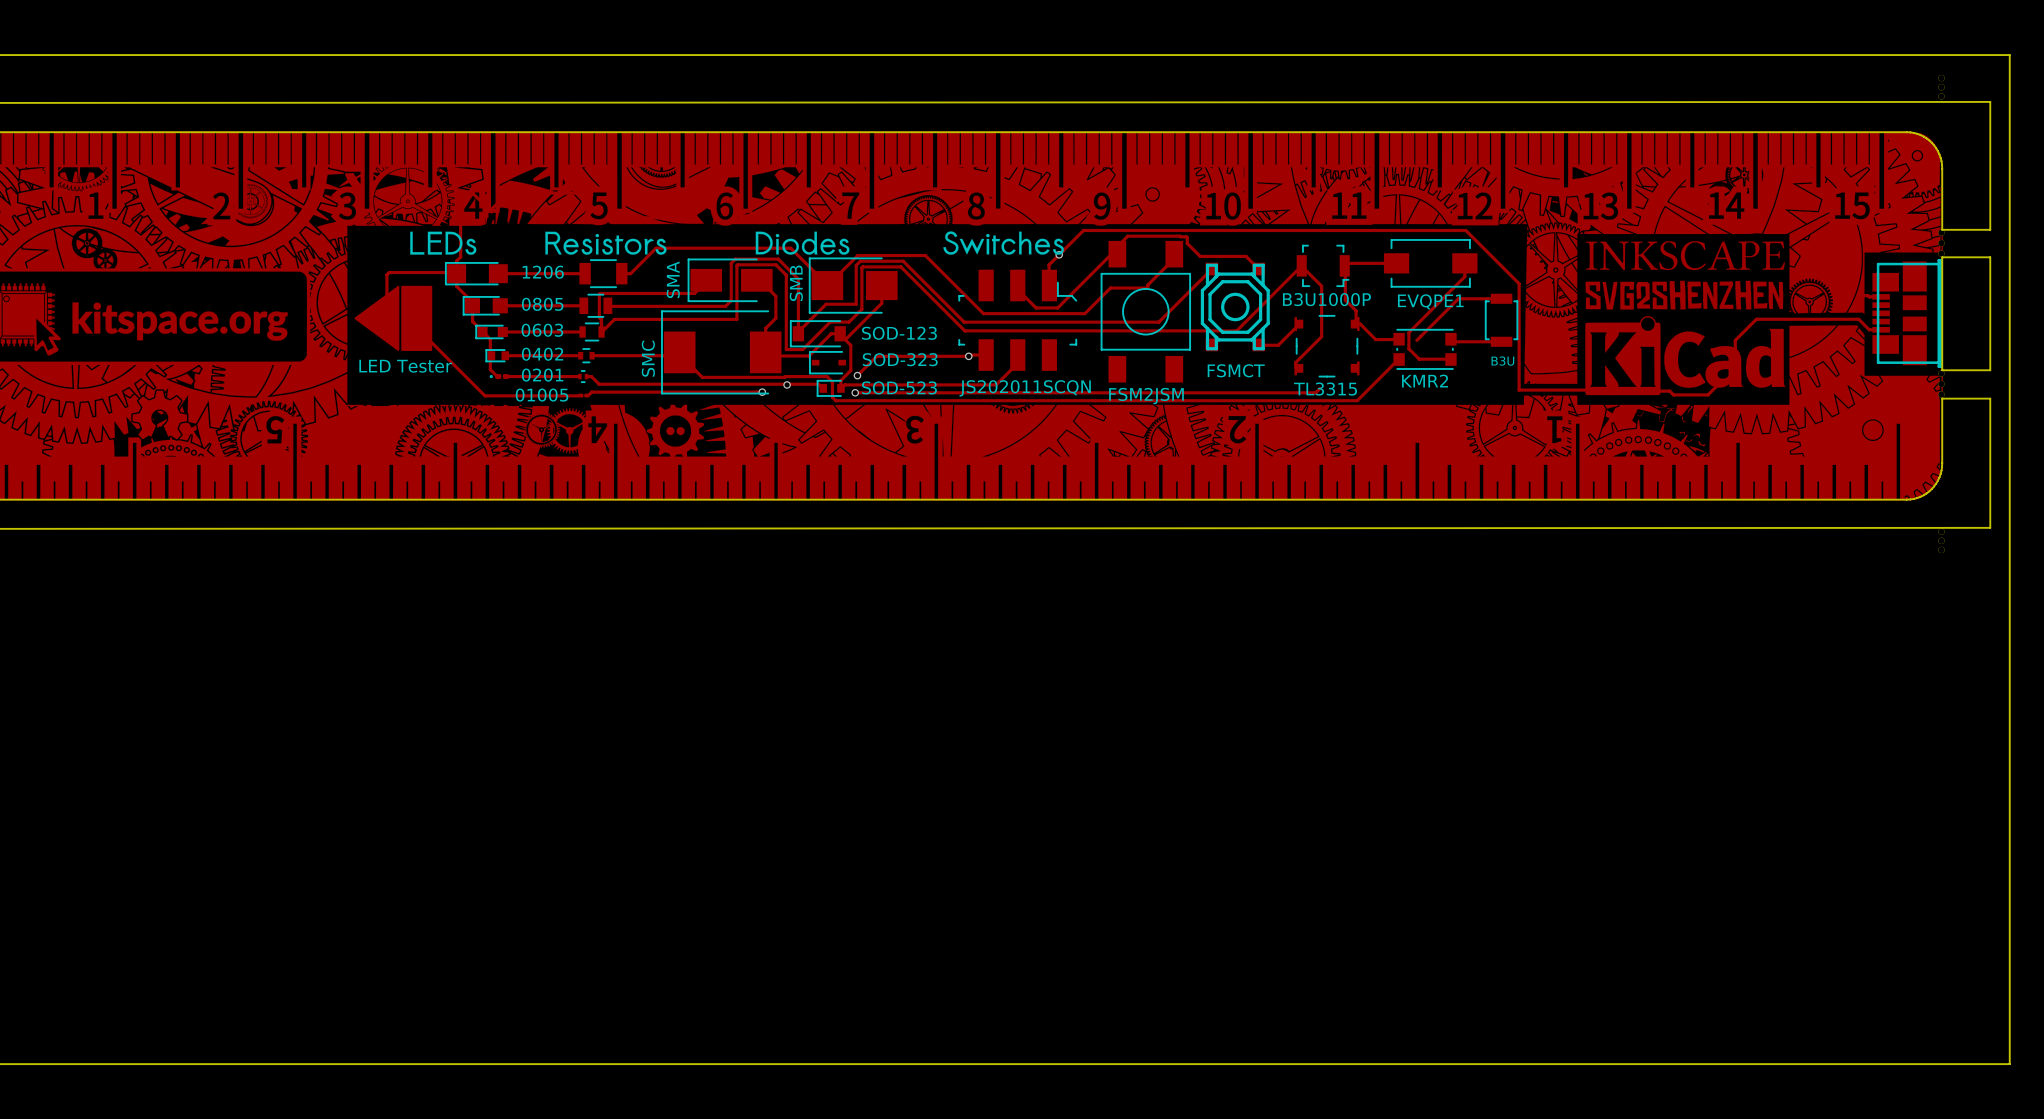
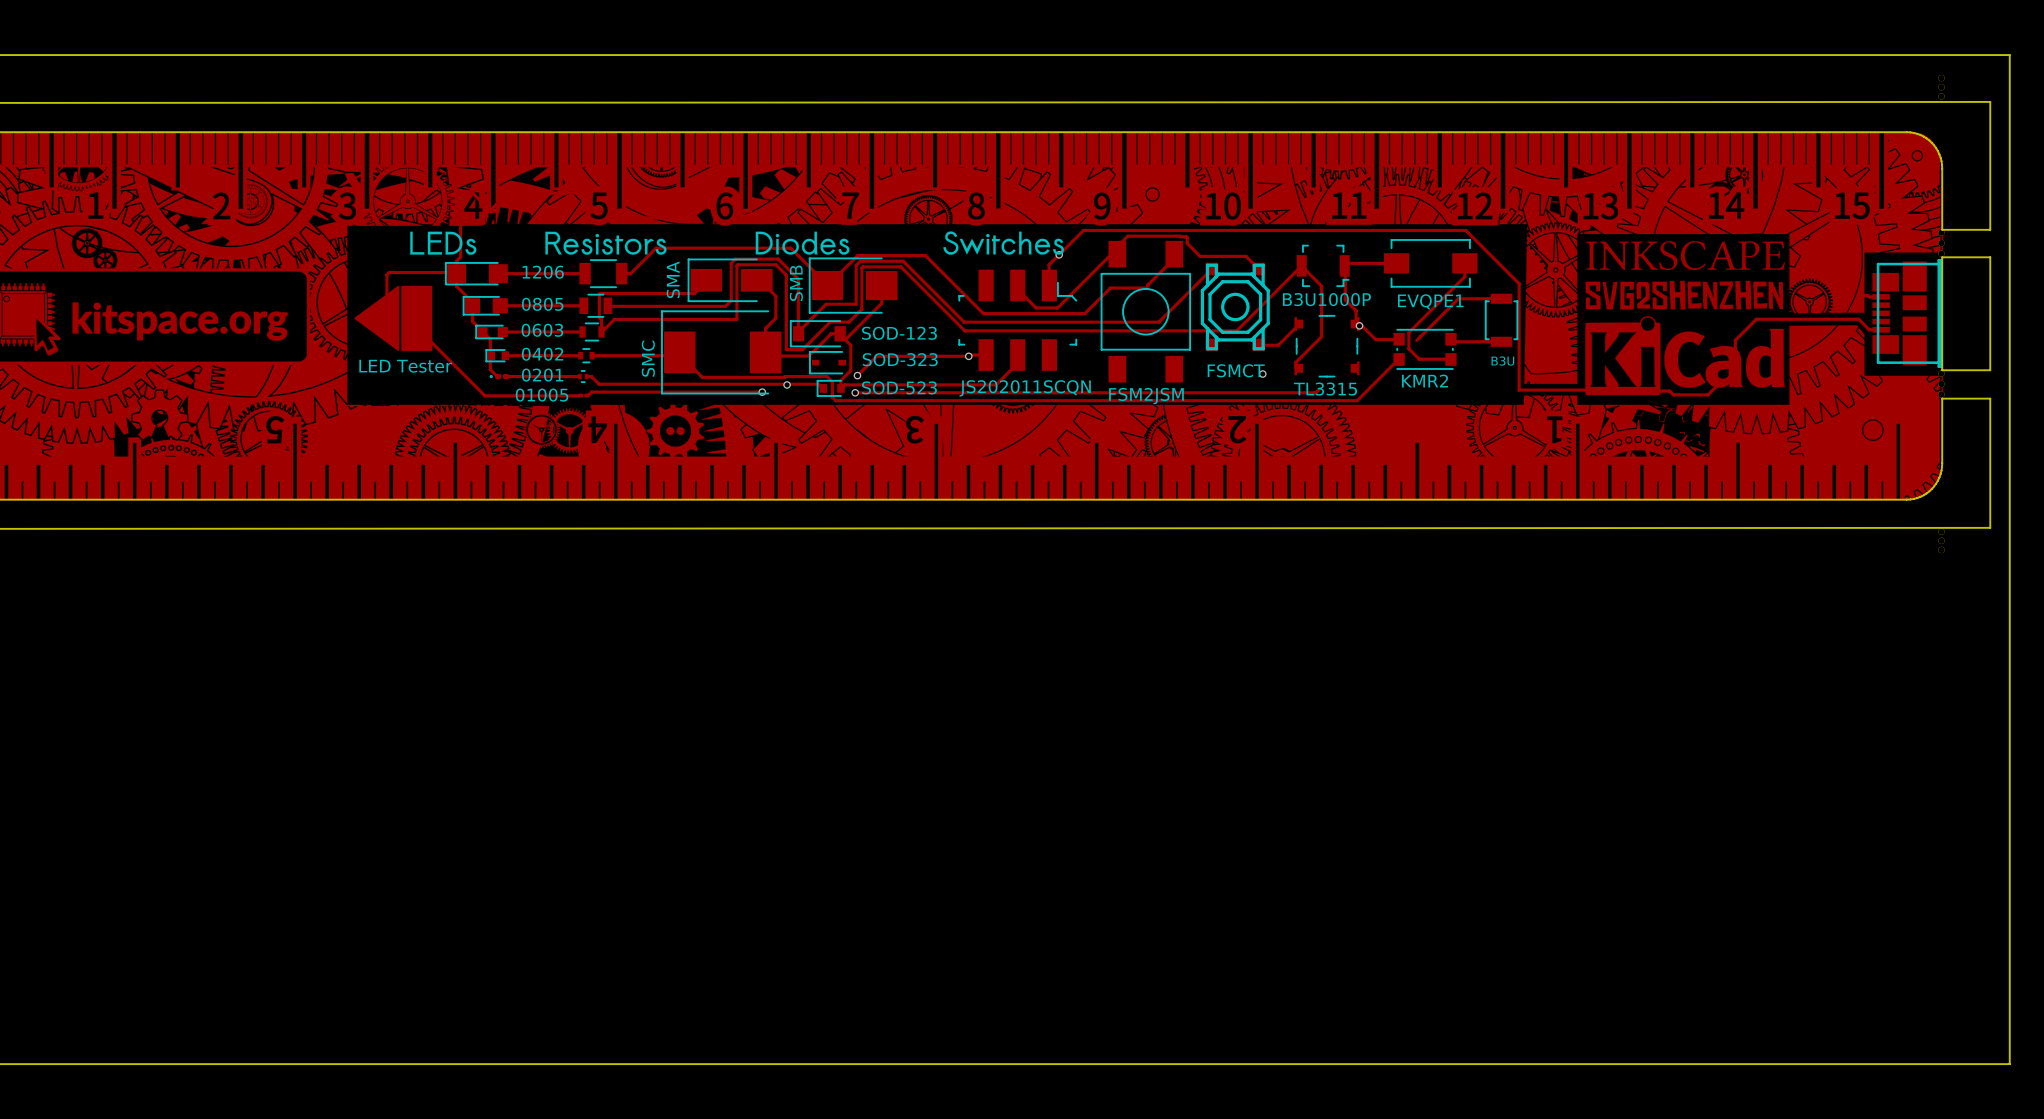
via: none -> (1359, 325)
via: none -> (1262, 374)

